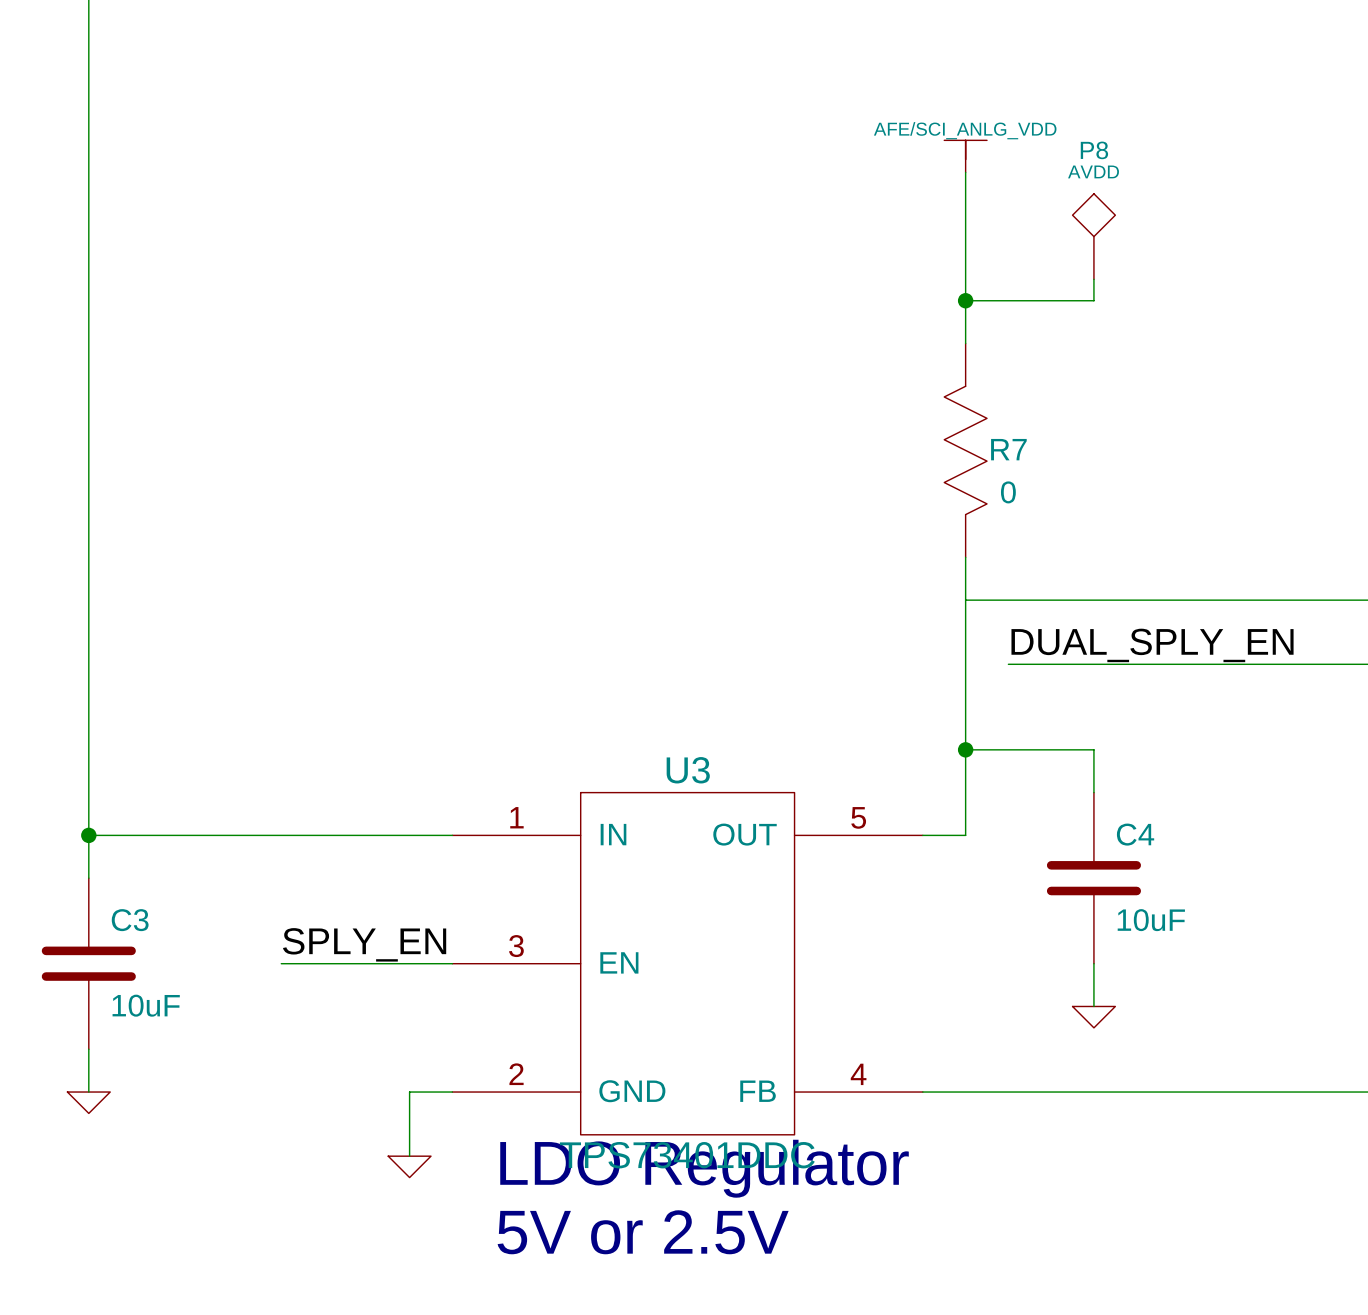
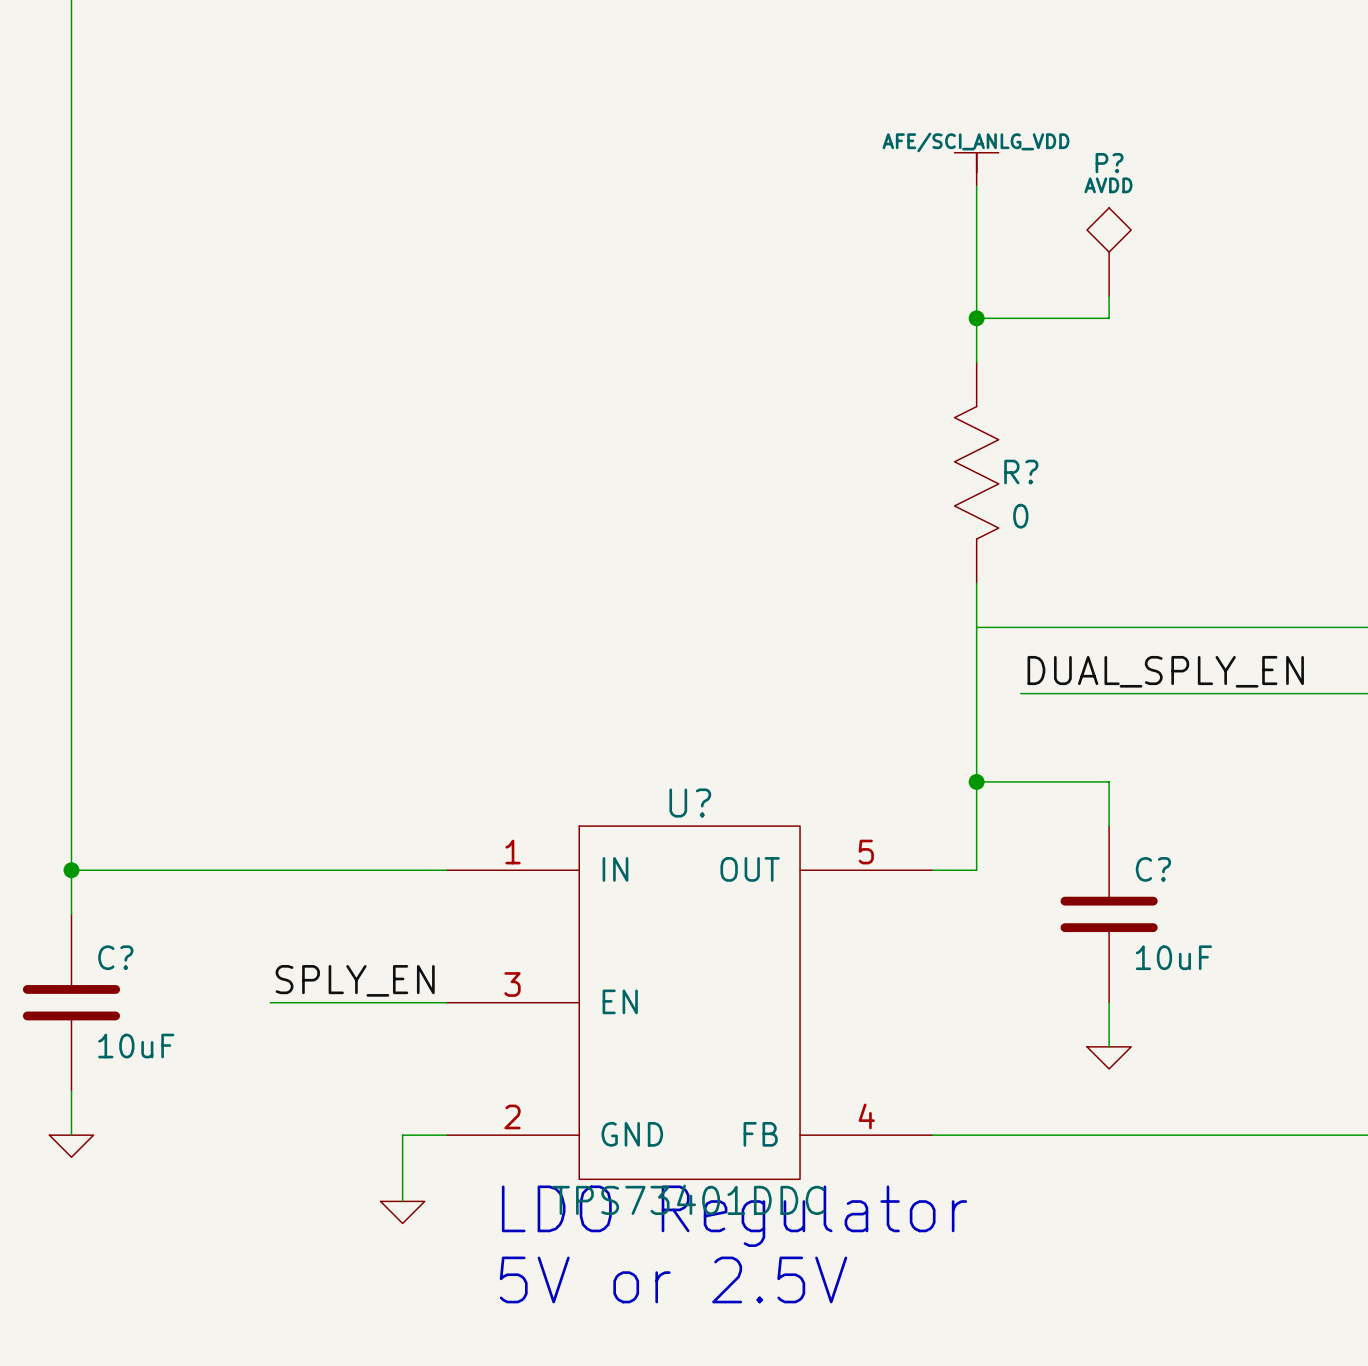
P8 name: P8 (1094, 150) -> P? (1109, 163)
R7 name: R7 (1008, 449) -> R? (1021, 472)
U3 name: U3 (688, 770) -> U? (690, 803)
C4 name: C4 (1135, 834) -> C? (1153, 869)
C3 name: C3 (130, 920) -> C? (115, 957)

